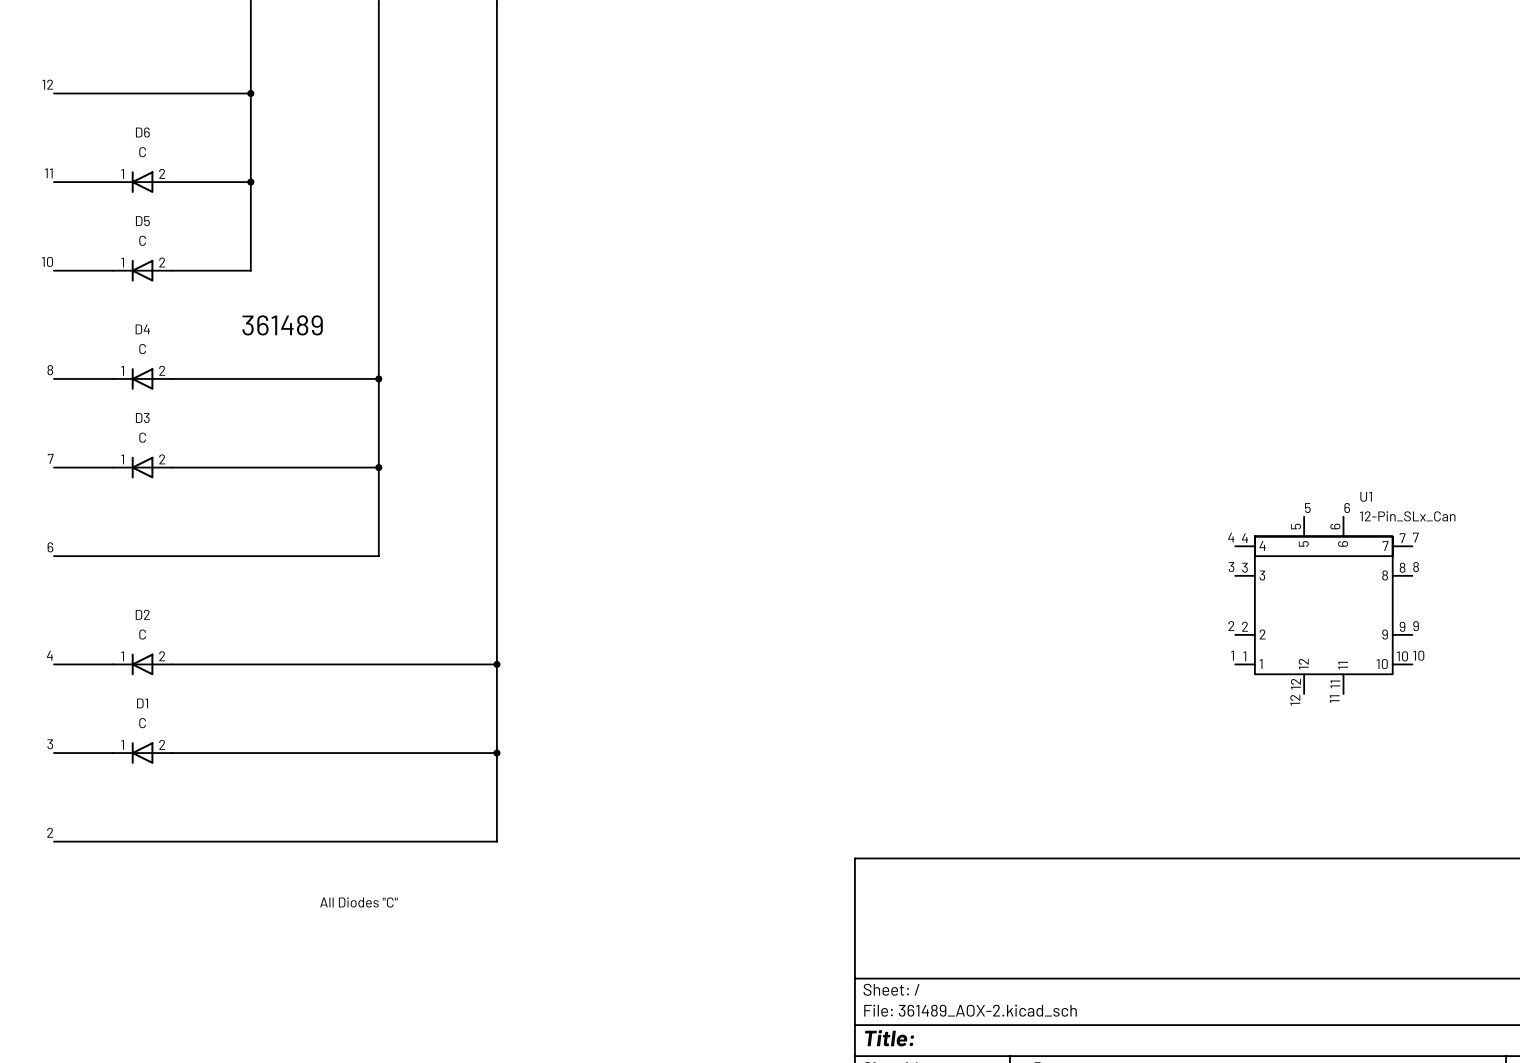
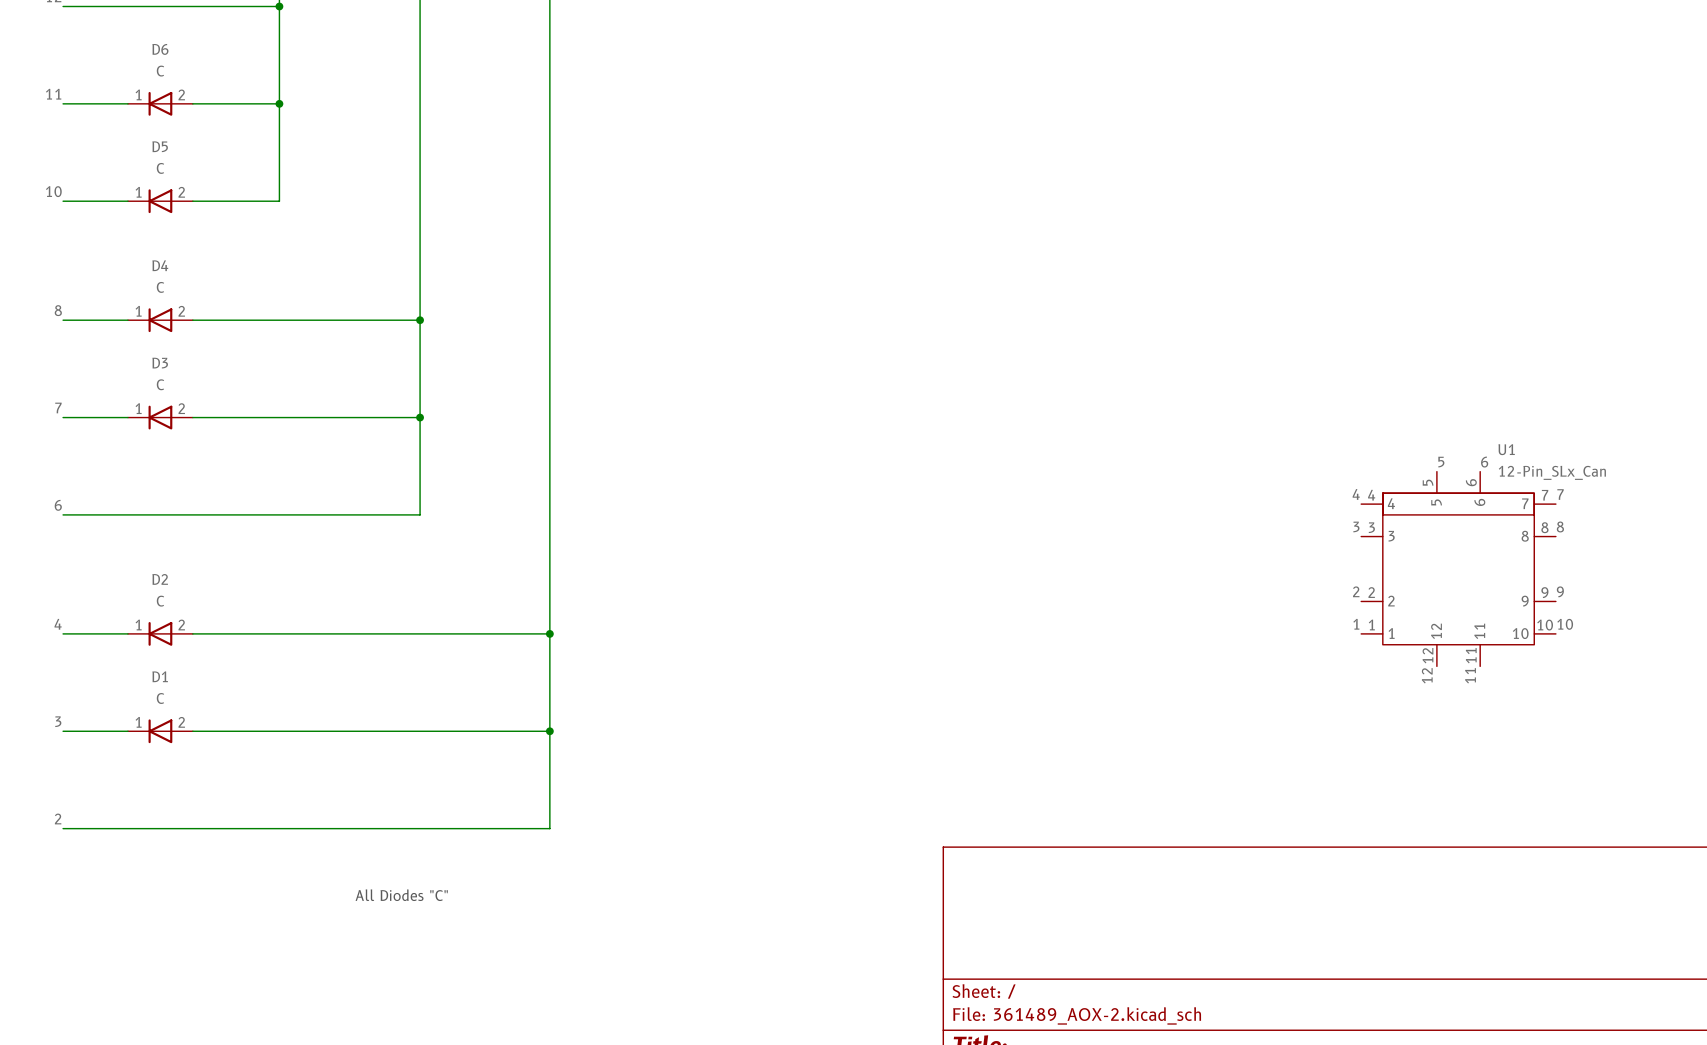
text: 361489 (282, 325) -> none

